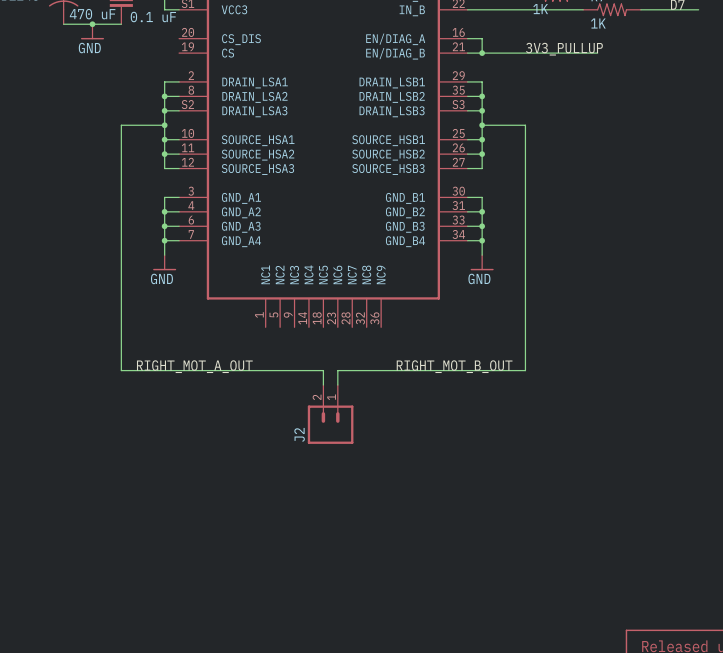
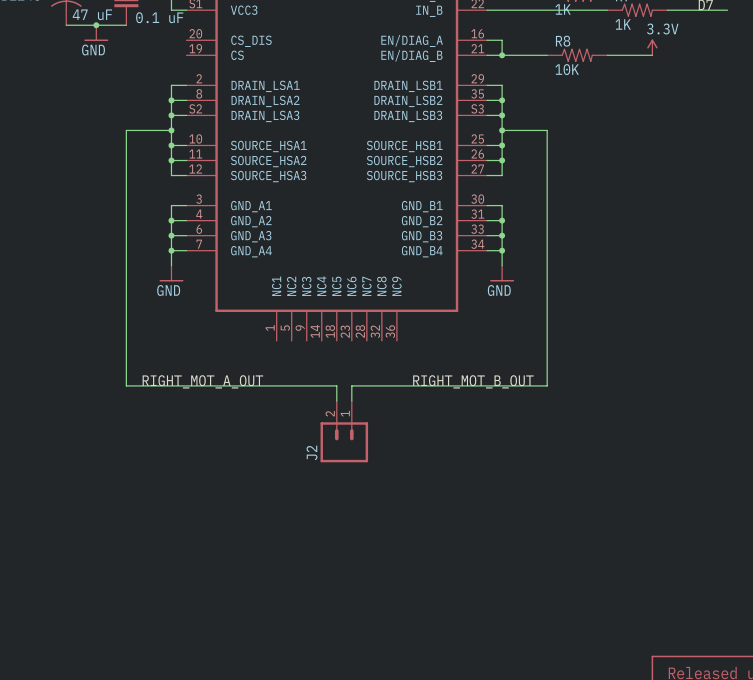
part value: 470 uF (92, 14) -> 47 uF (92, 14)
power symbol: none -> 3.3V (652, 47)
label: 3V3_PULLUP (564, 49) -> none
R8: none -> 10K (577, 55)
wire: none -> (622, 55) (652, 55)

